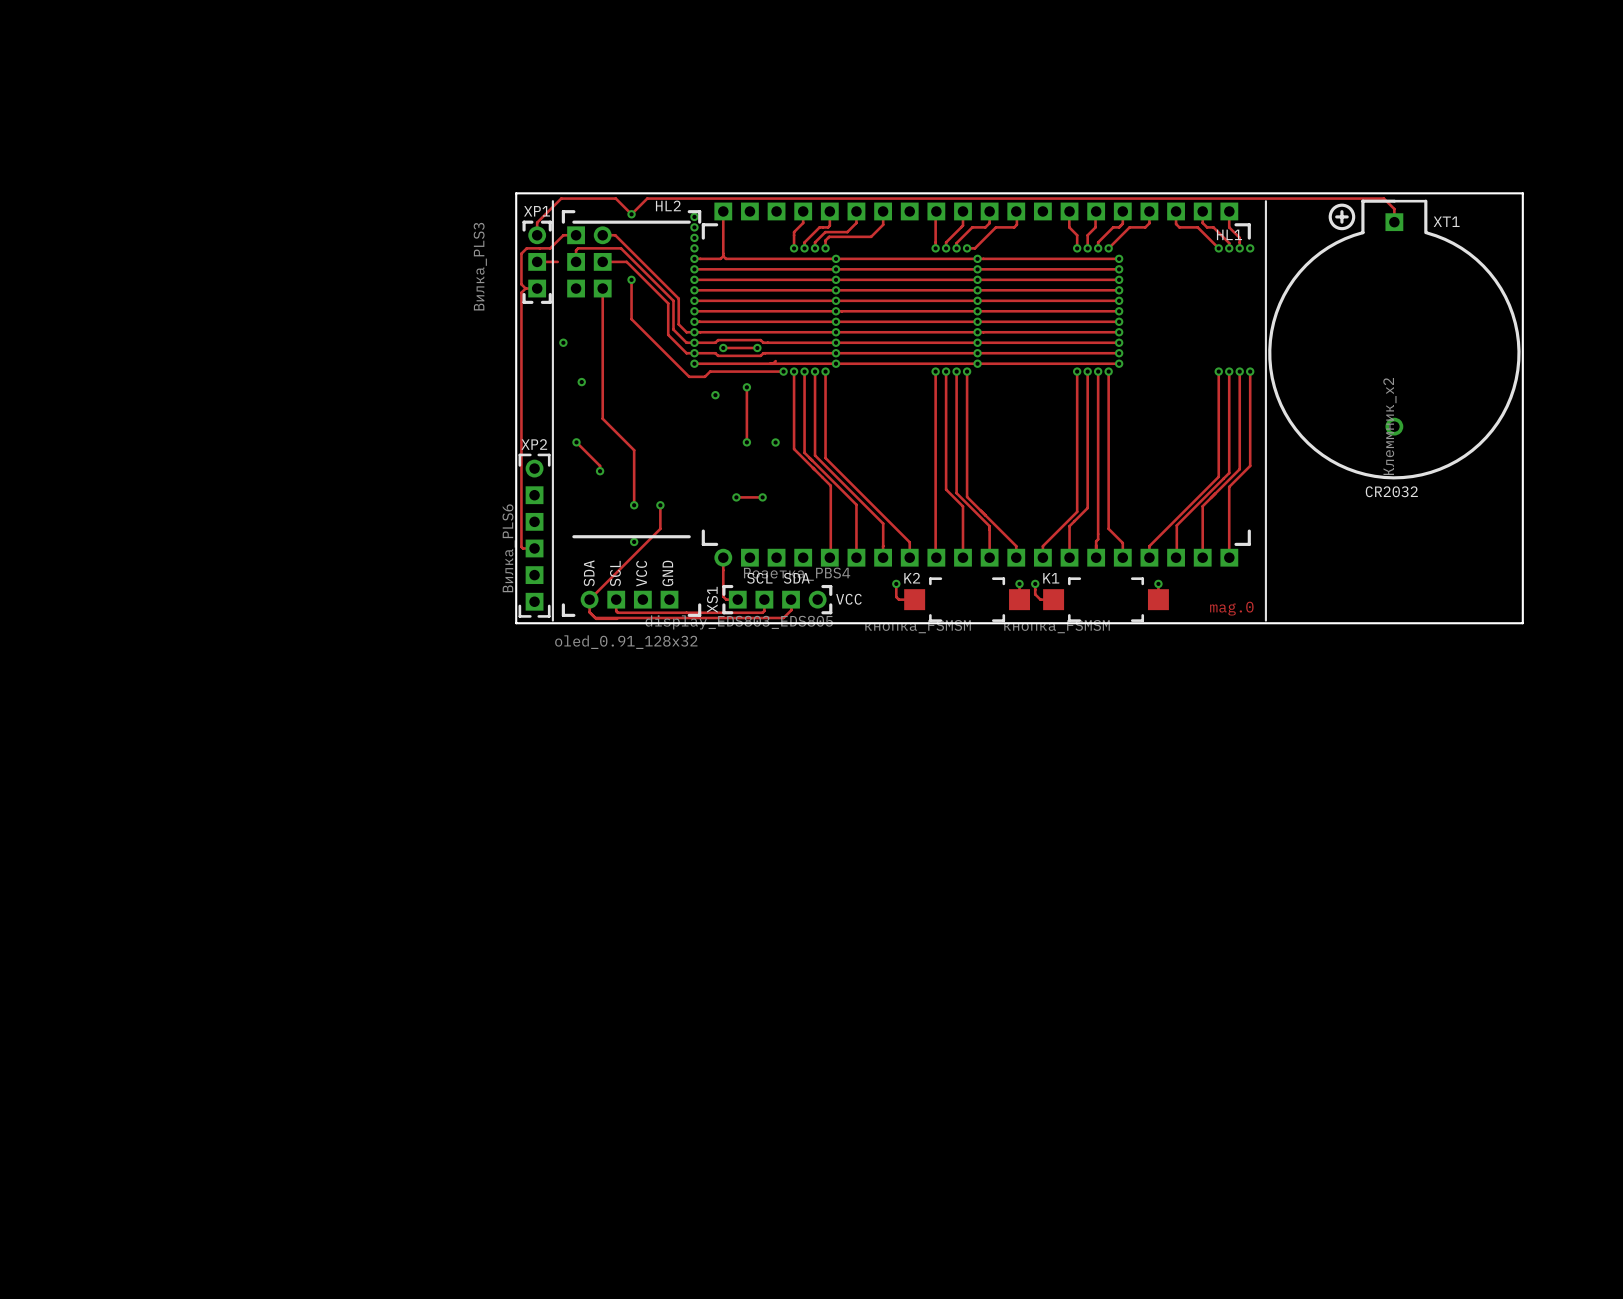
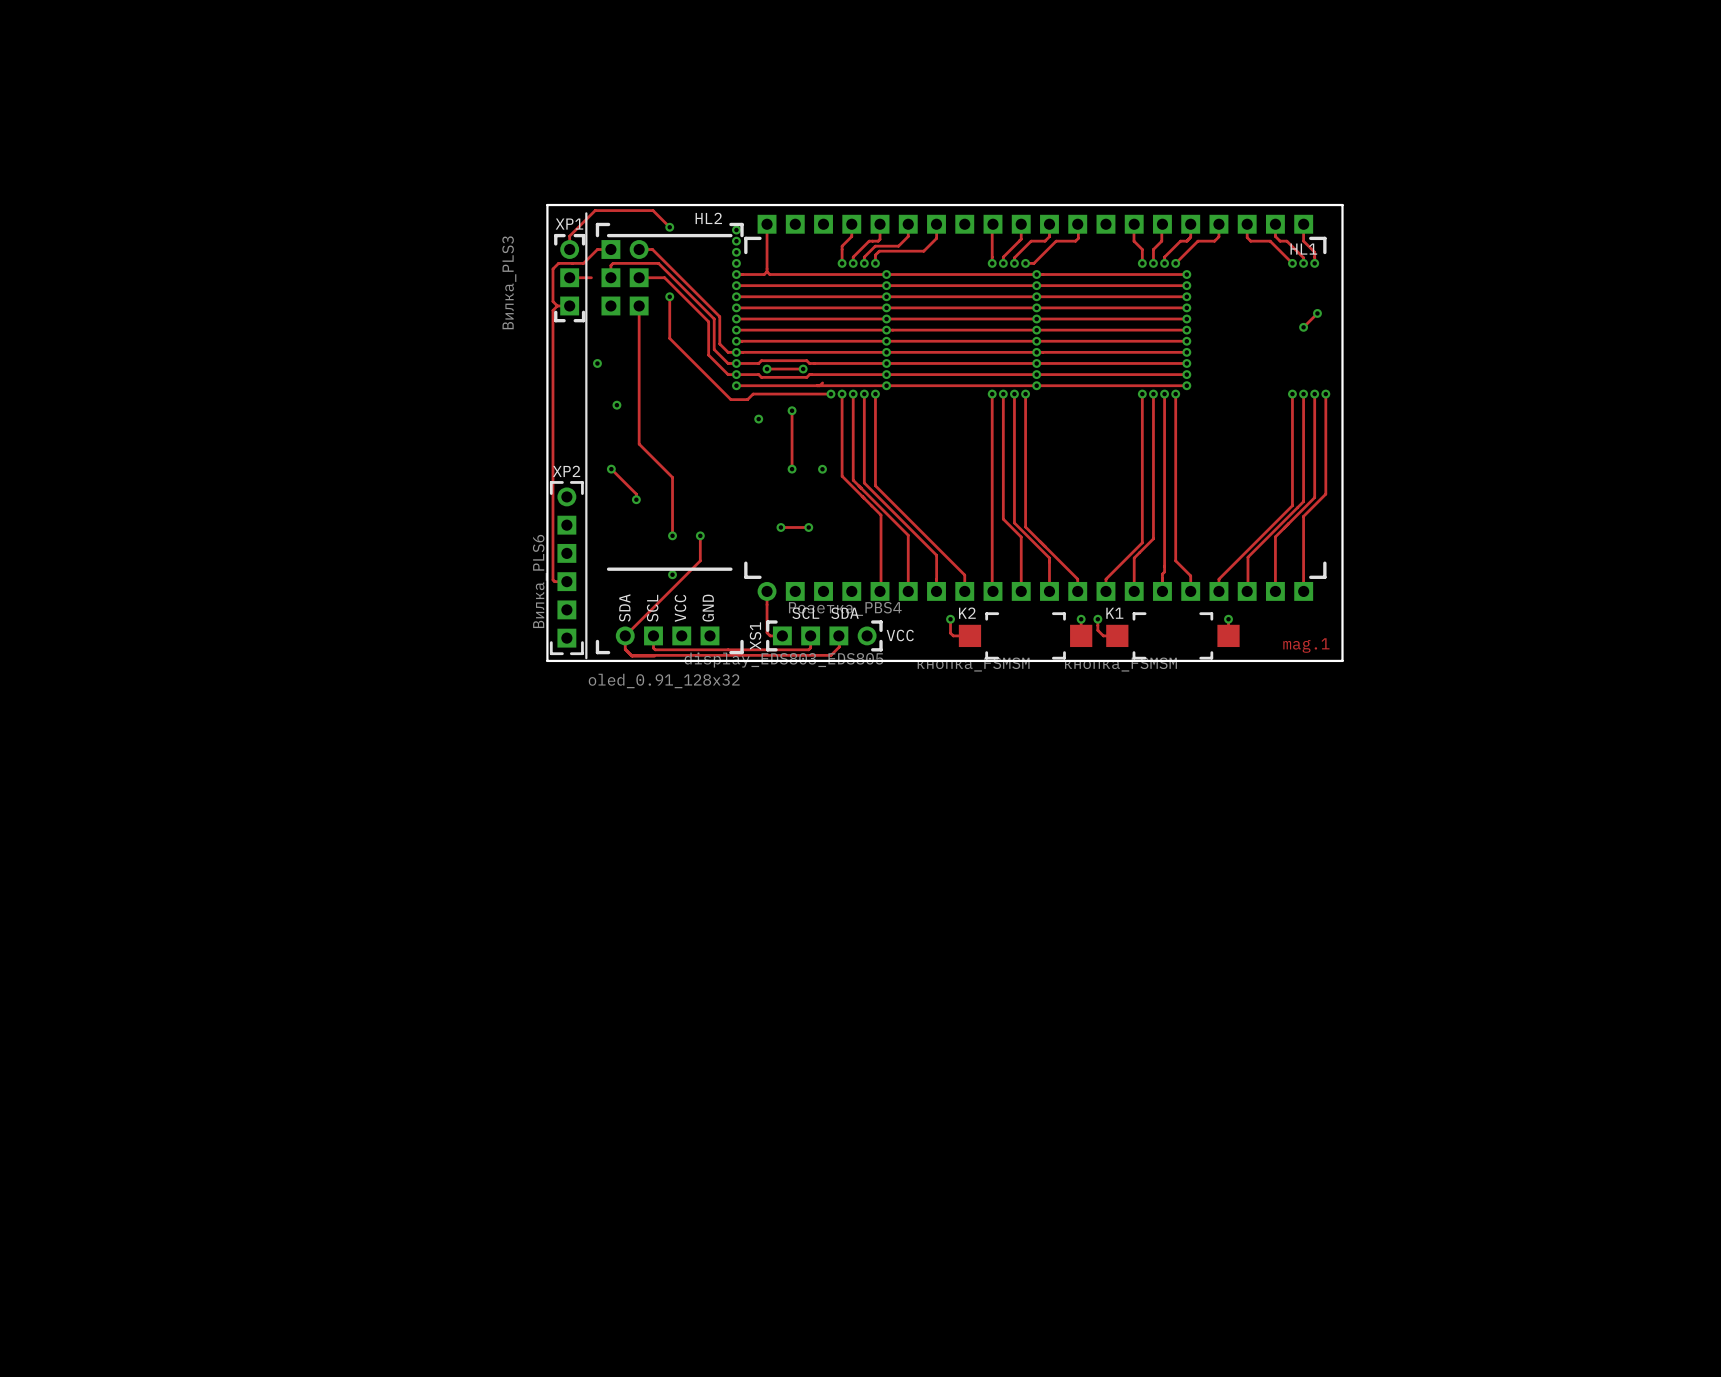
board edge: (1265, 193) (1522, 193) (1522, 623) (1265, 623) -> (1342, 205) (1342, 660)
line: (1265, 201) (1265, 620) -> none
track: (631, 214) (647, 198) (1383, 198) (1394, 209) (1394, 222) -> none
via: (1250, 248) -> none
track: none -> (1317, 313) (1303, 327)
via: none -> (1317, 313)
via: none -> (1303, 327)
XТ1: Клеммник_х2 (1394, 339) -> none
text: CR2032 (1391, 491) -> none
text: mag.0 (1231, 608) -> mag.1 (1306, 645)

